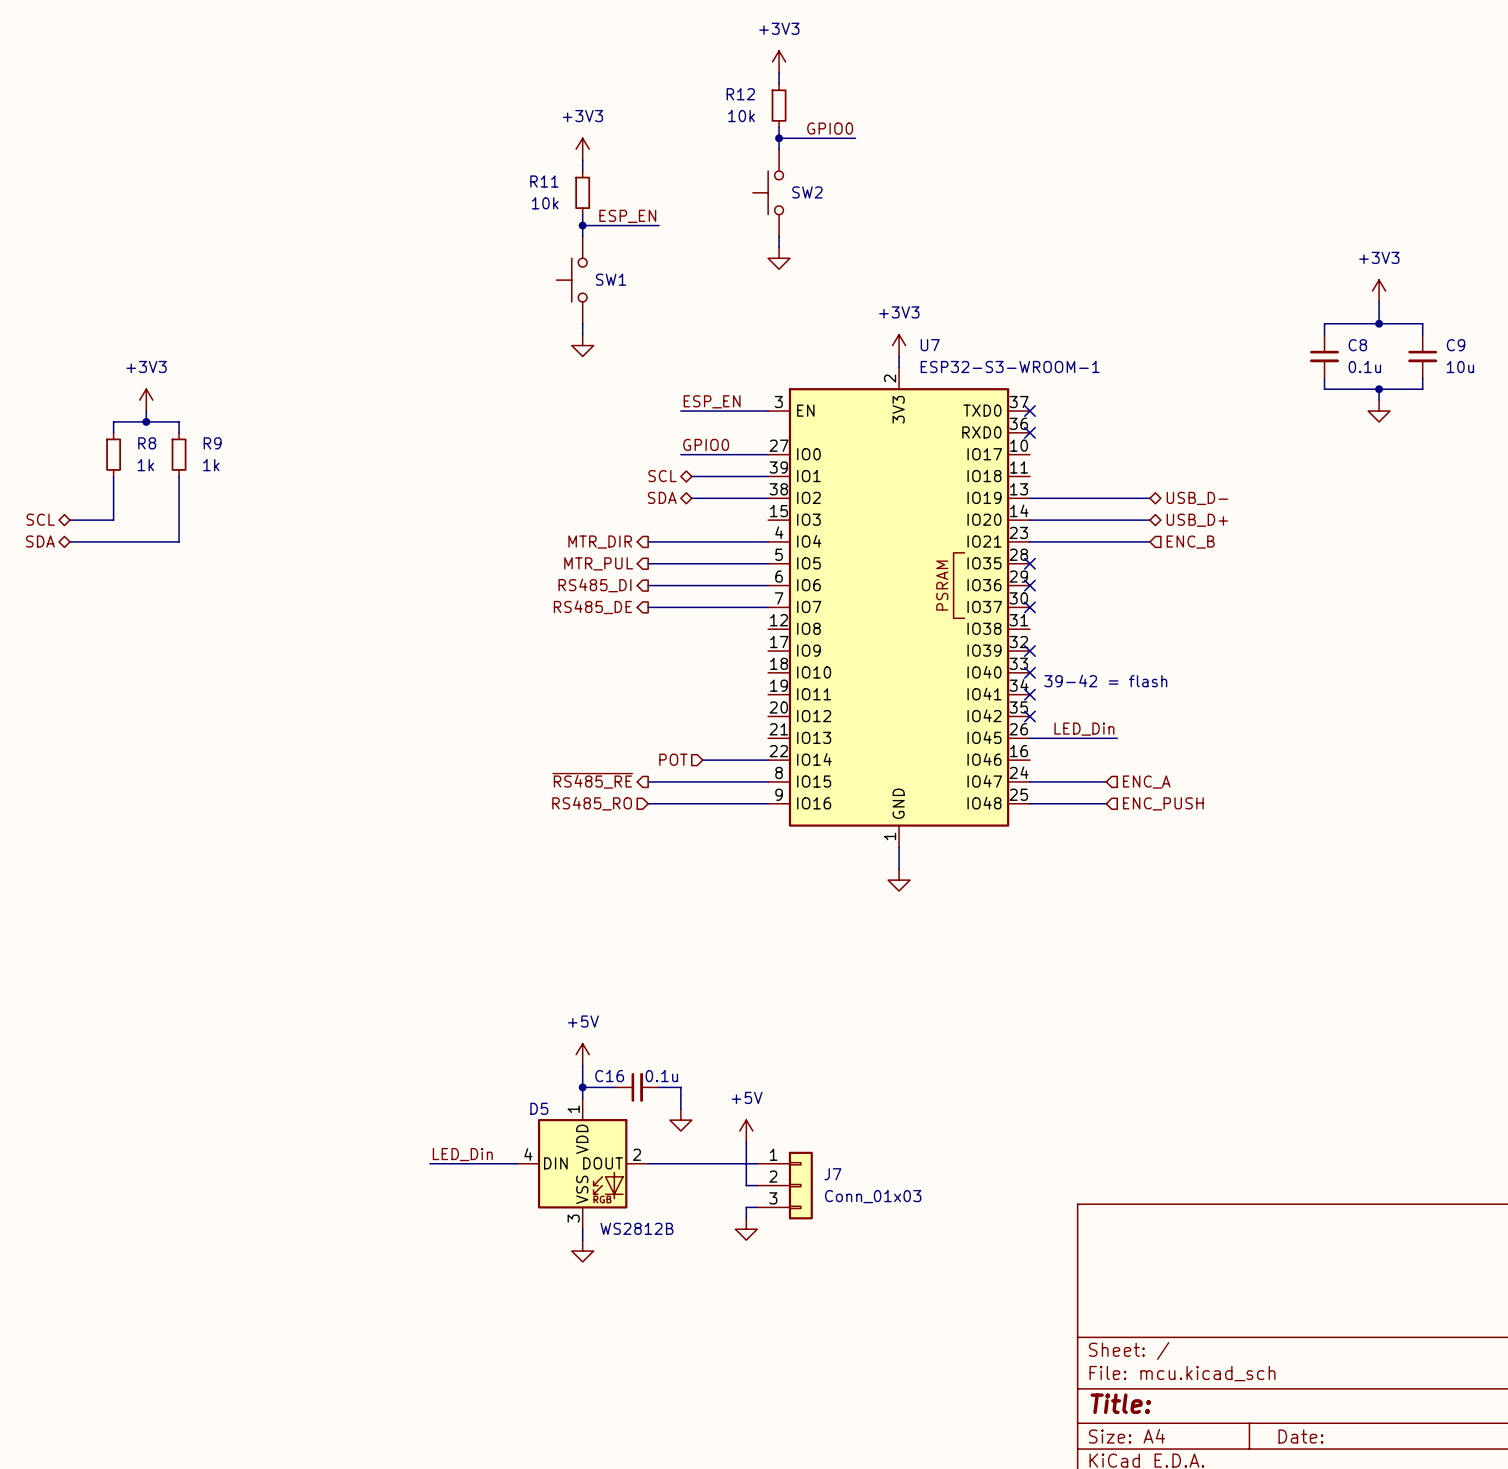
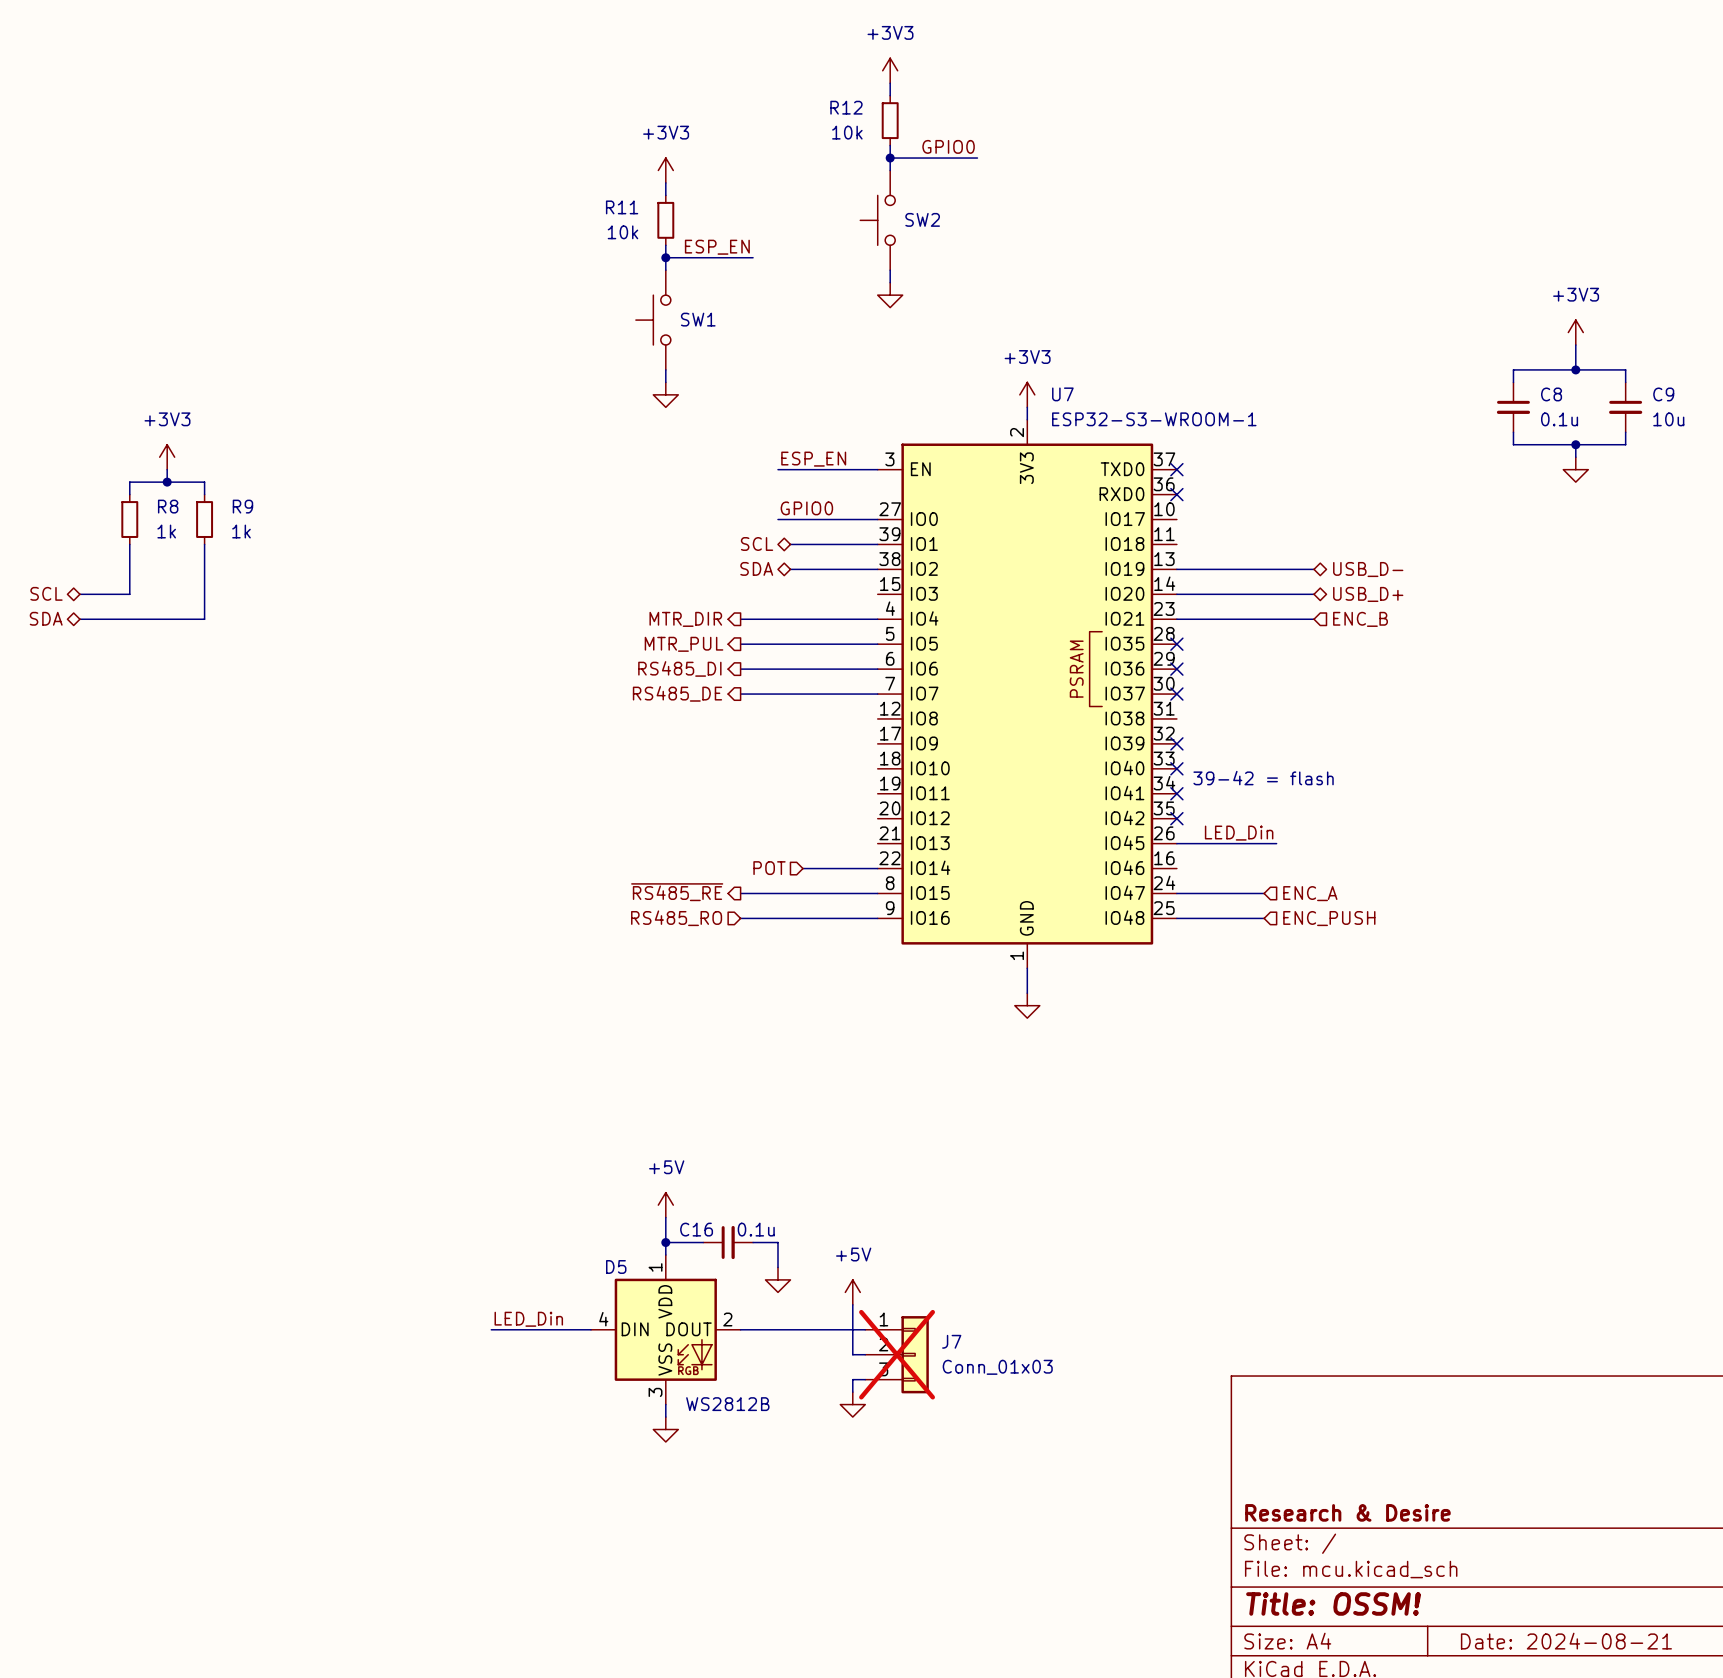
J7 do-not-place cross: none -> (897, 1354)
title block: none -> Research & Desire (1347, 1512)
title block: Title: (1120, 1403) -> Title: OSSM! (1333, 1603)
title block: Date: (1300, 1436) -> Date: 2024-08-21 (1566, 1641)

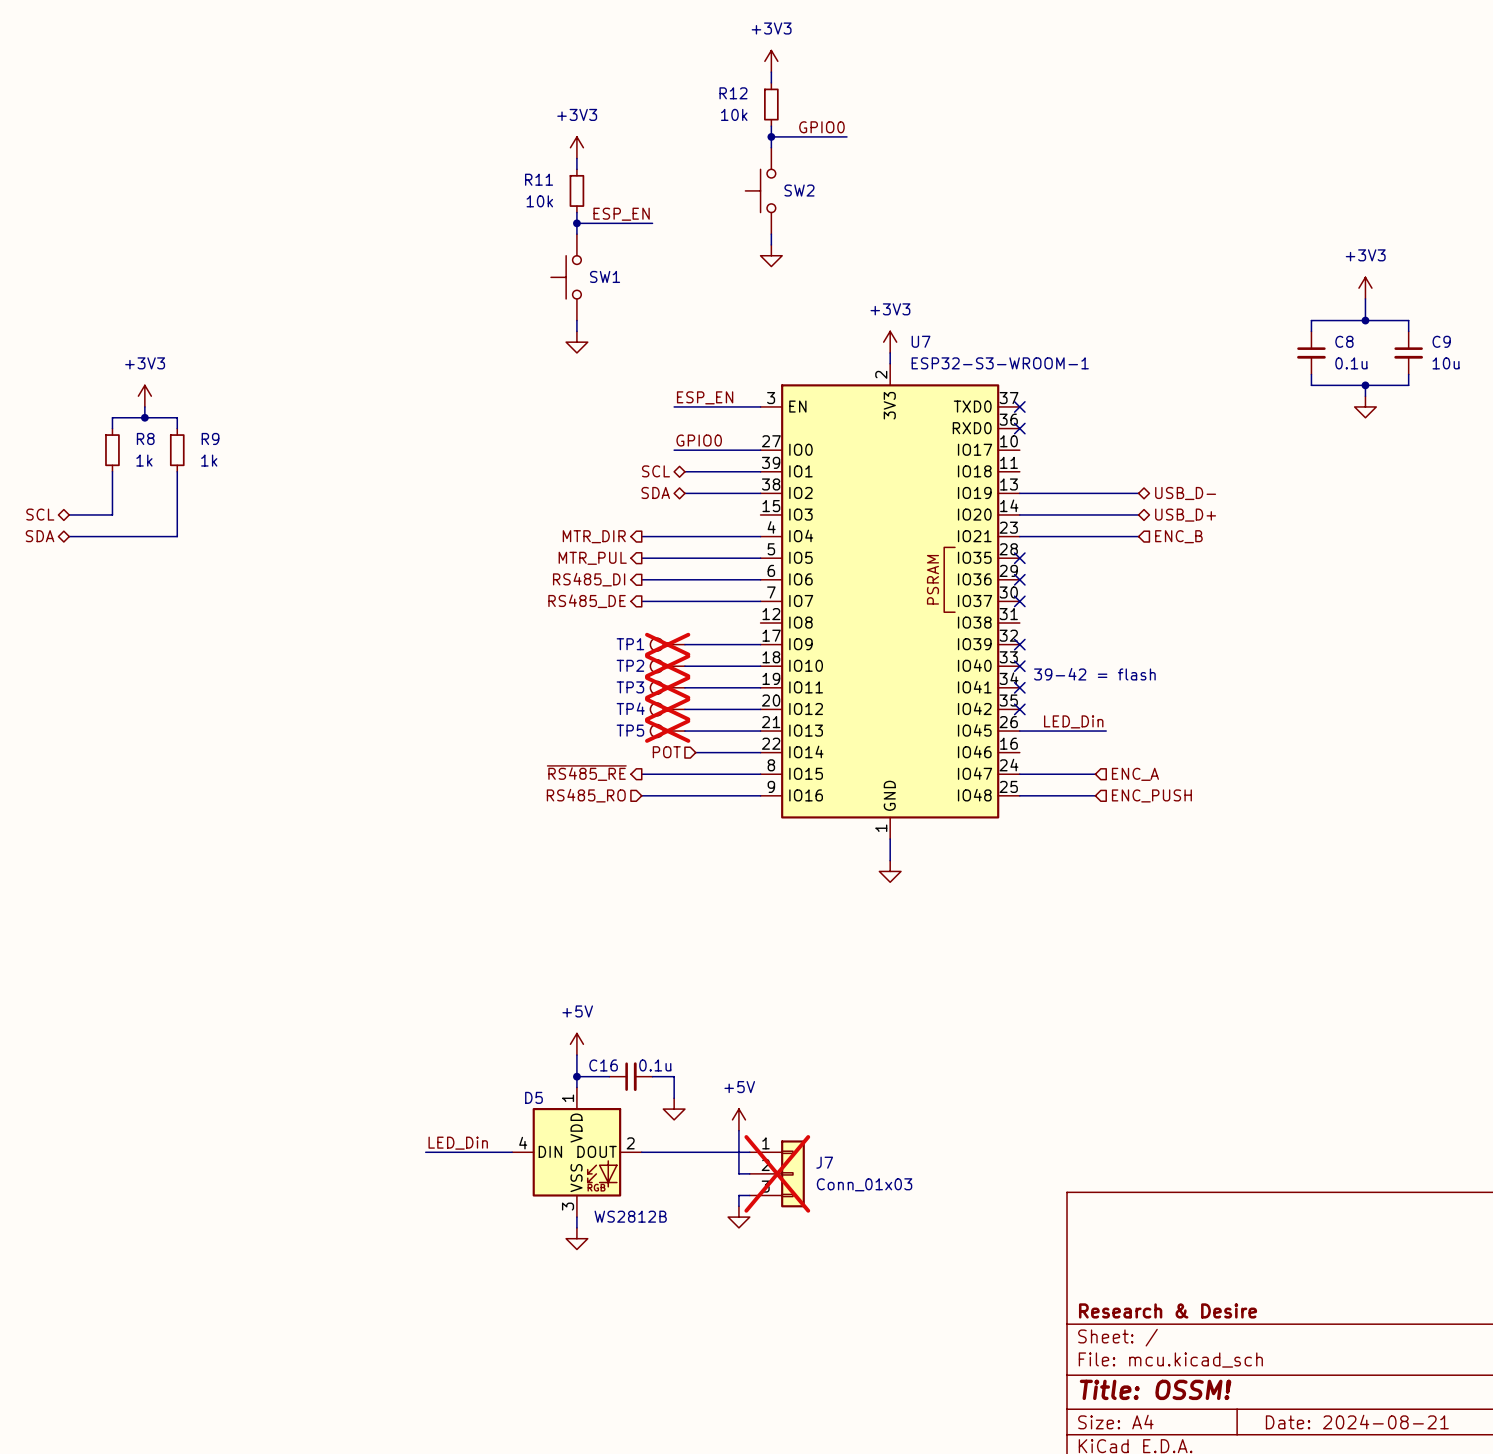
TP1: none -> (667, 644)
wire: none -> (684, 644) (760, 644)
TP2: none -> (667, 666)
wire: none -> (684, 666) (760, 666)
TP3: none -> (667, 687)
wire: none -> (684, 687) (760, 687)
TP4: none -> (667, 709)
wire: none -> (684, 709) (760, 709)
TP5: none -> (667, 731)
wire: none -> (684, 731) (760, 731)

